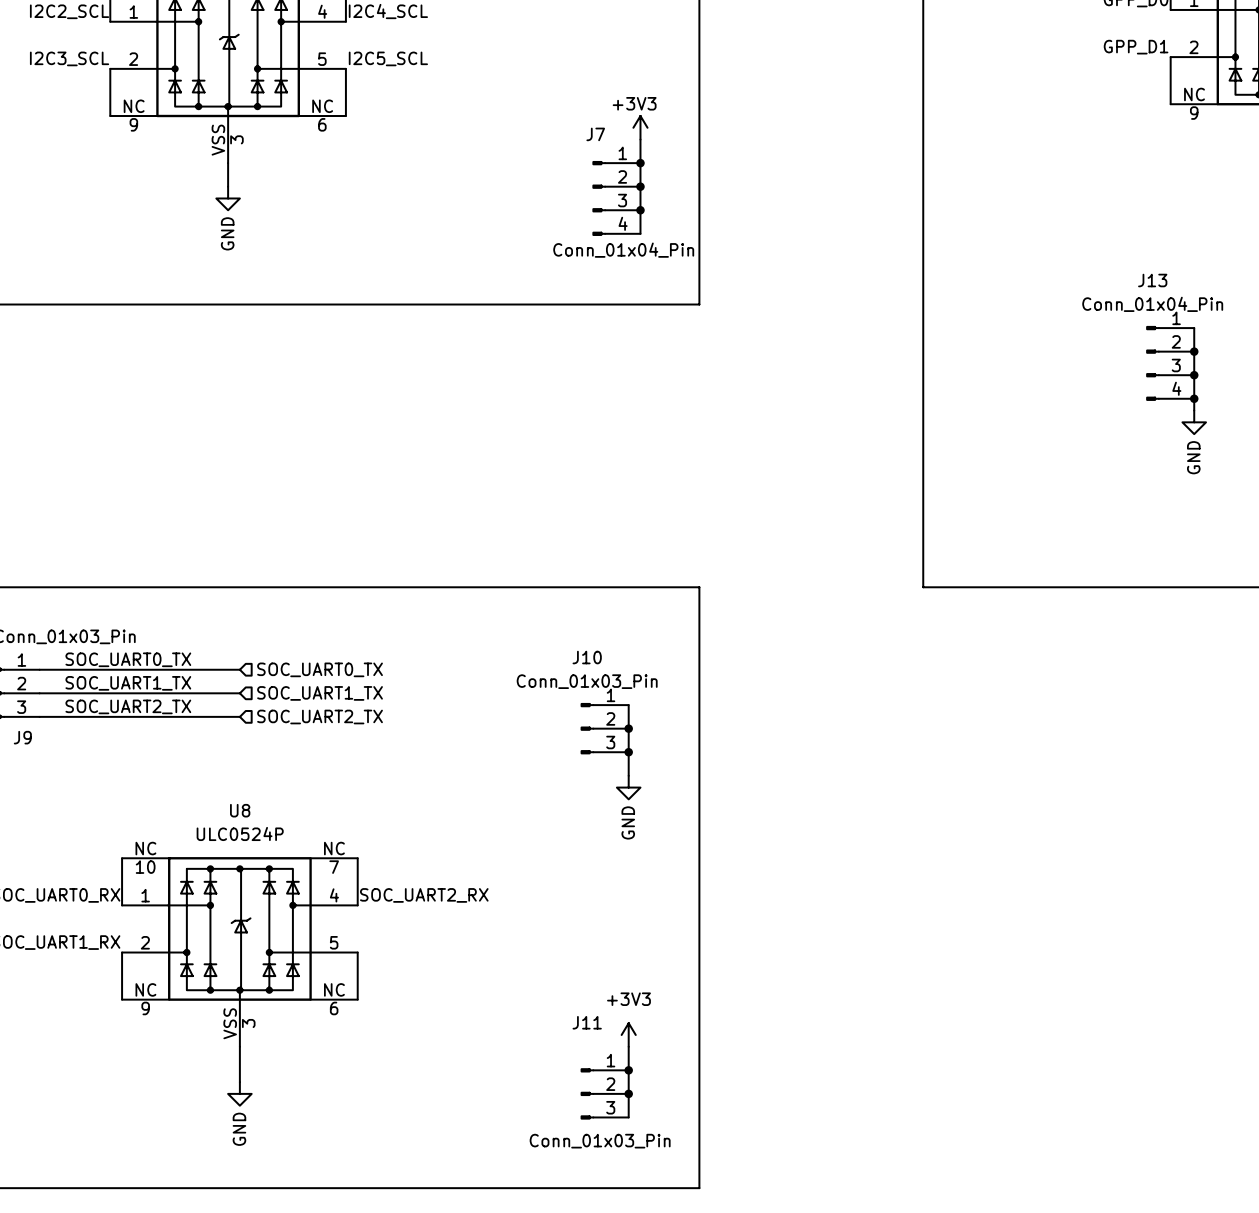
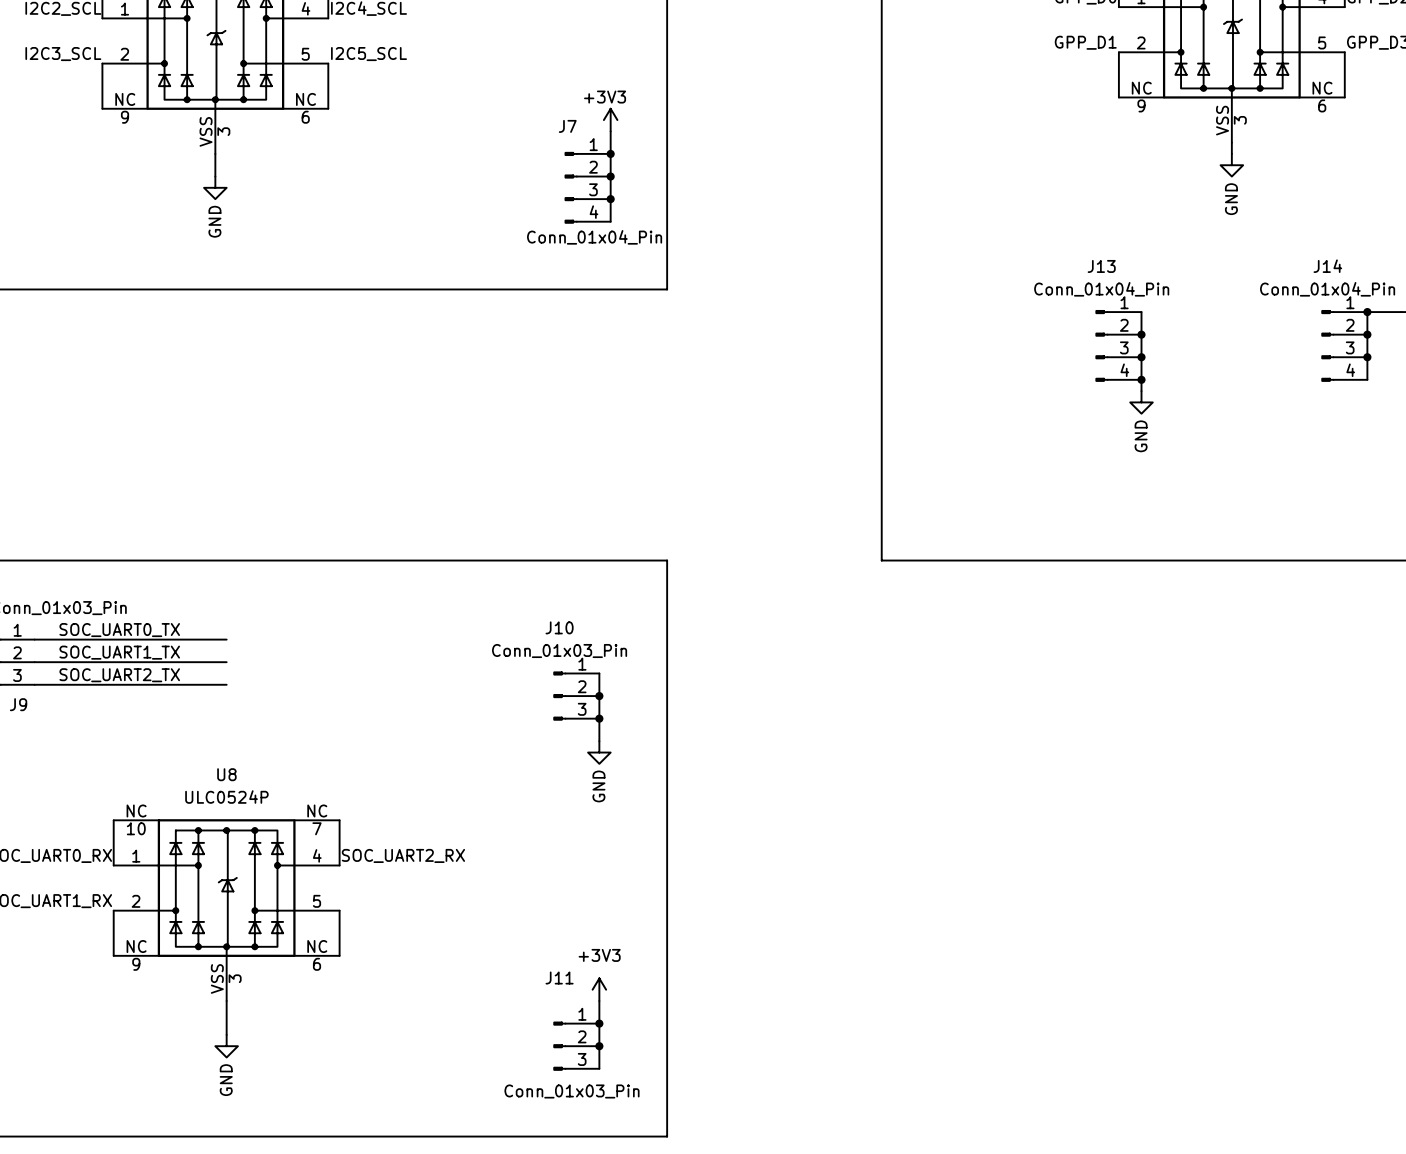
hierarchical label: SOC_UART0_TX (320, 669) -> none
hierarchical label: SOC_UART1_TX (320, 693) -> none
hierarchical label: SOC_UART2_TX (320, 717) -> none

